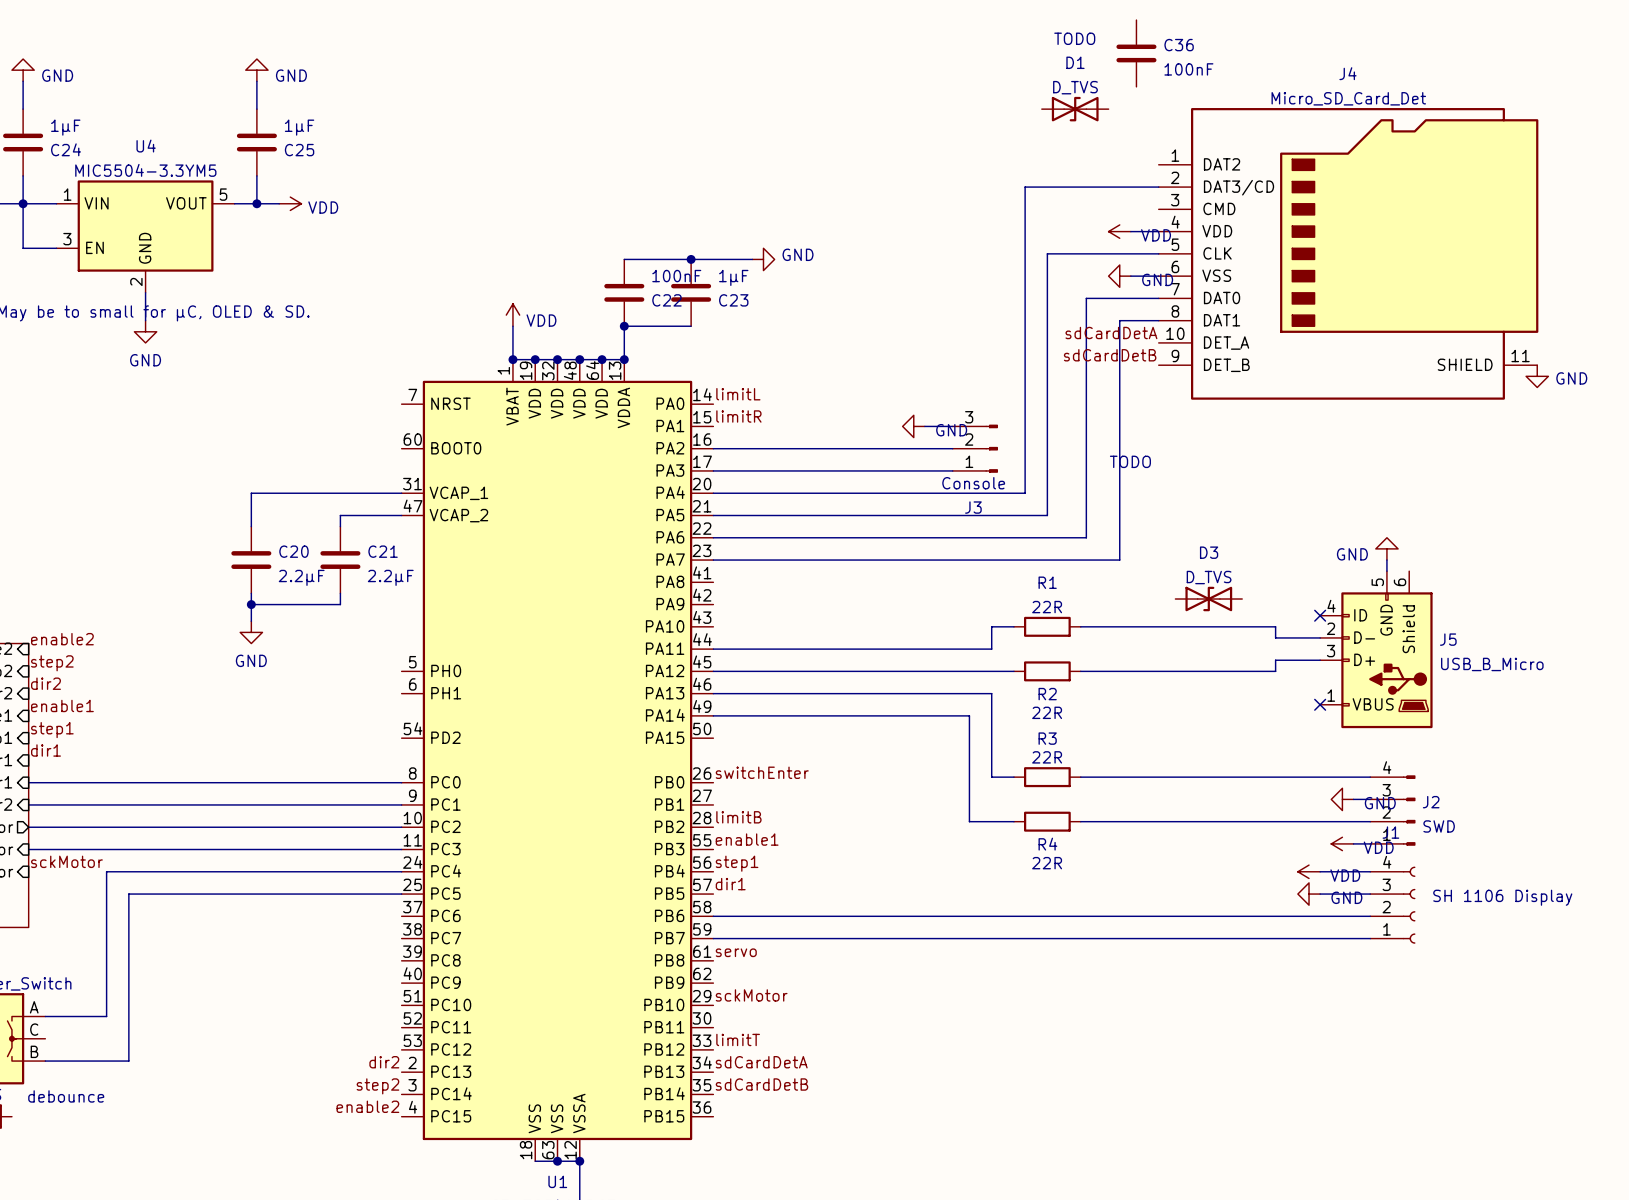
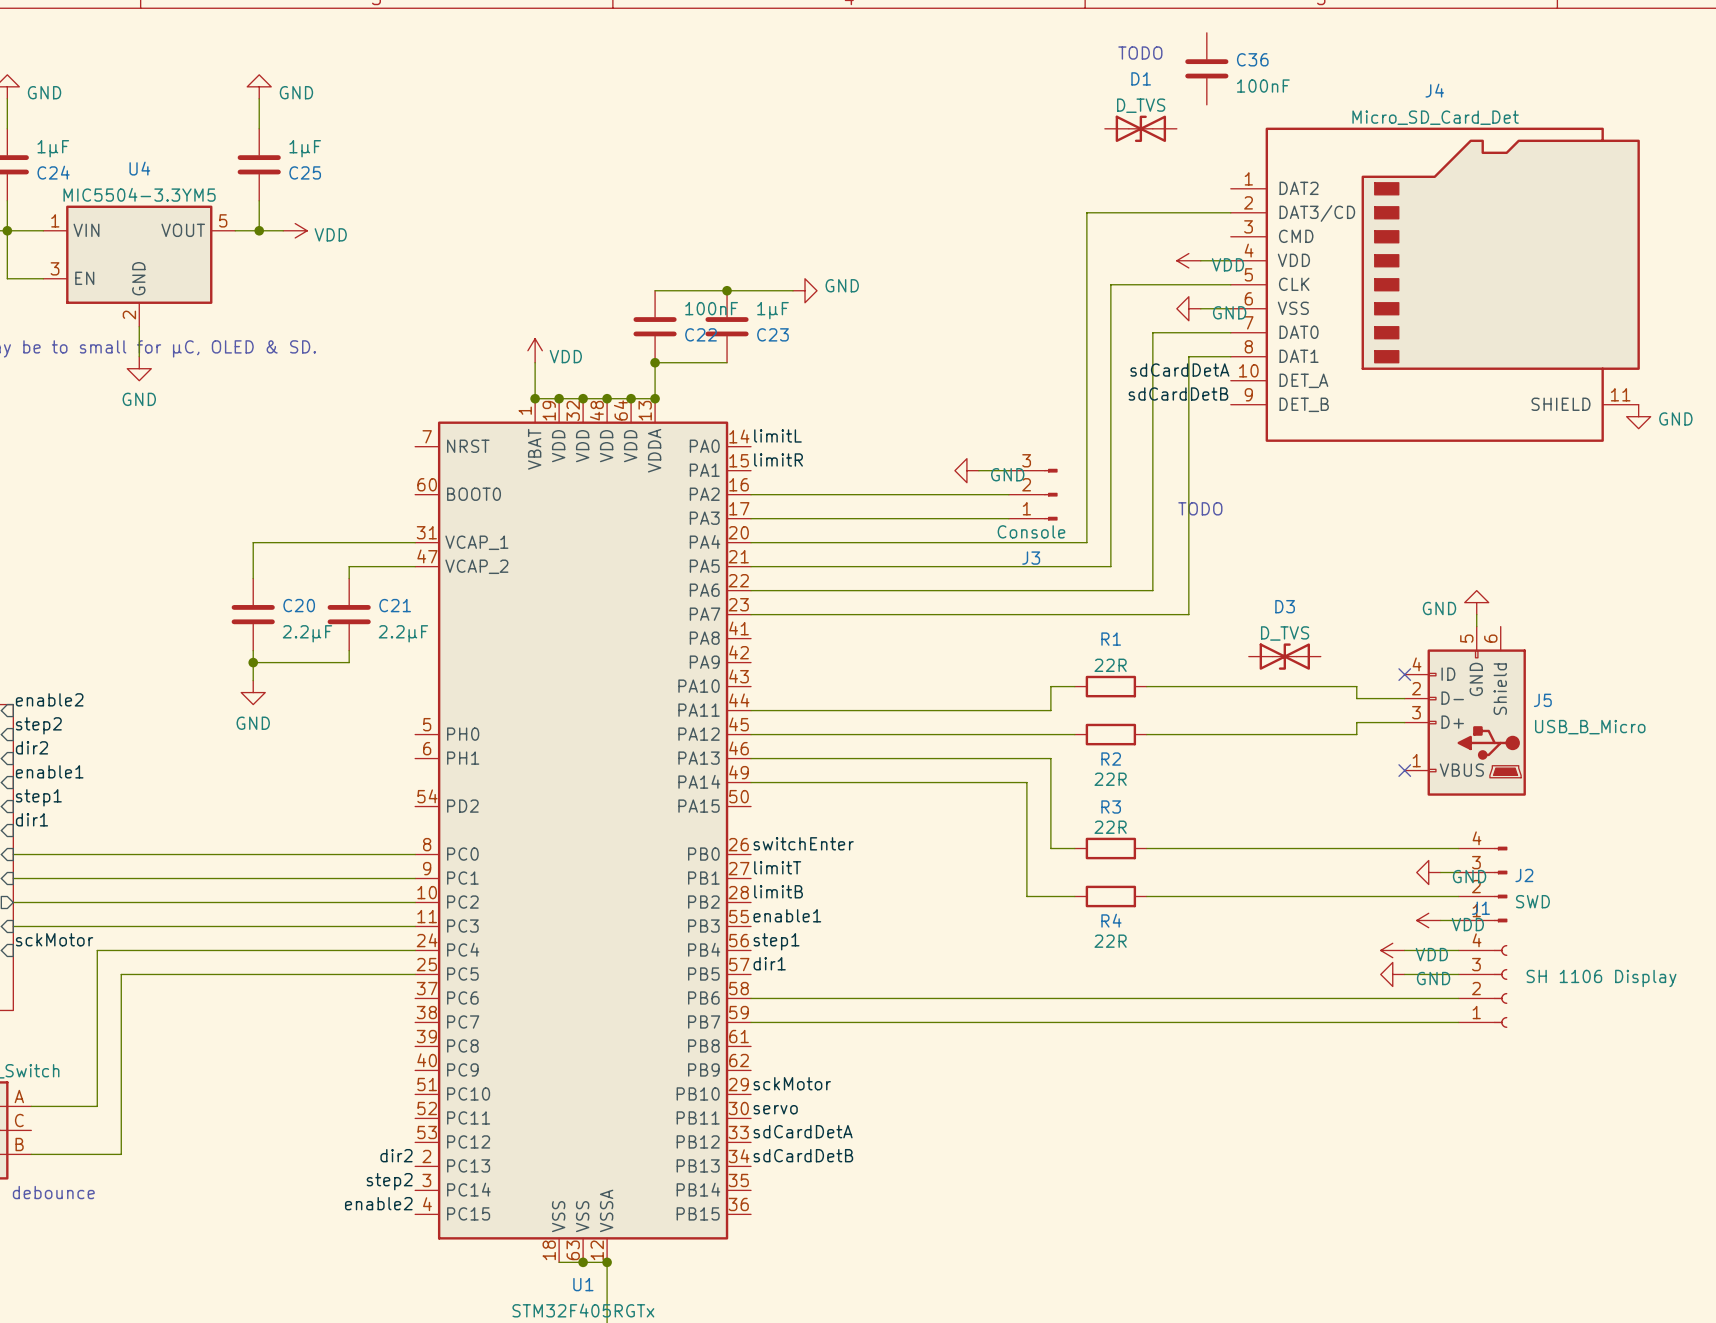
label: none -> limitT (777, 867)
label position: servo (736, 952) -> servo (775, 1109)
label: limitT (738, 1039) -> sdCardDetA (803, 1131)
label: sdCardDetA (761, 1062) -> sdCardDetB (803, 1155)
label: sdCardDetB (761, 1084) -> none

